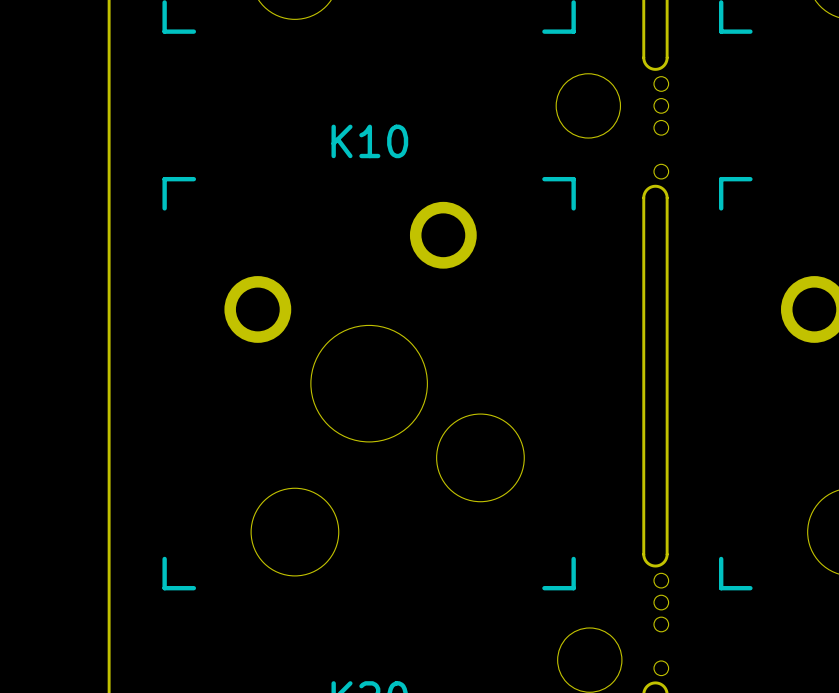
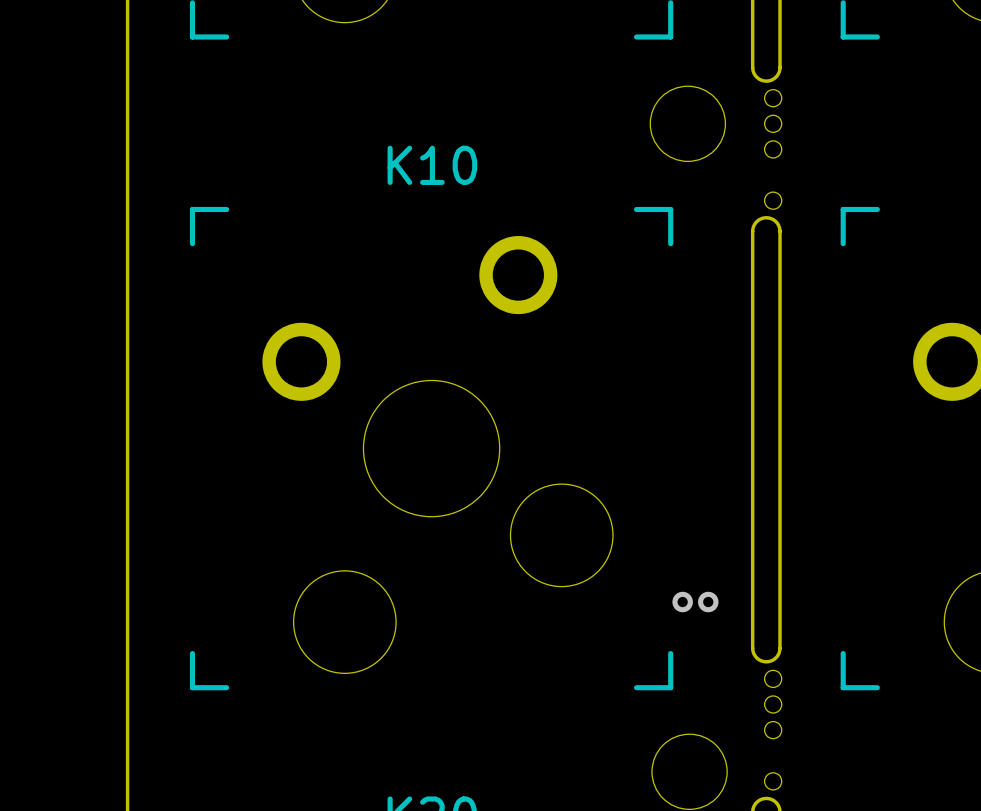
via: none -> (682, 602)
via: none -> (708, 602)

